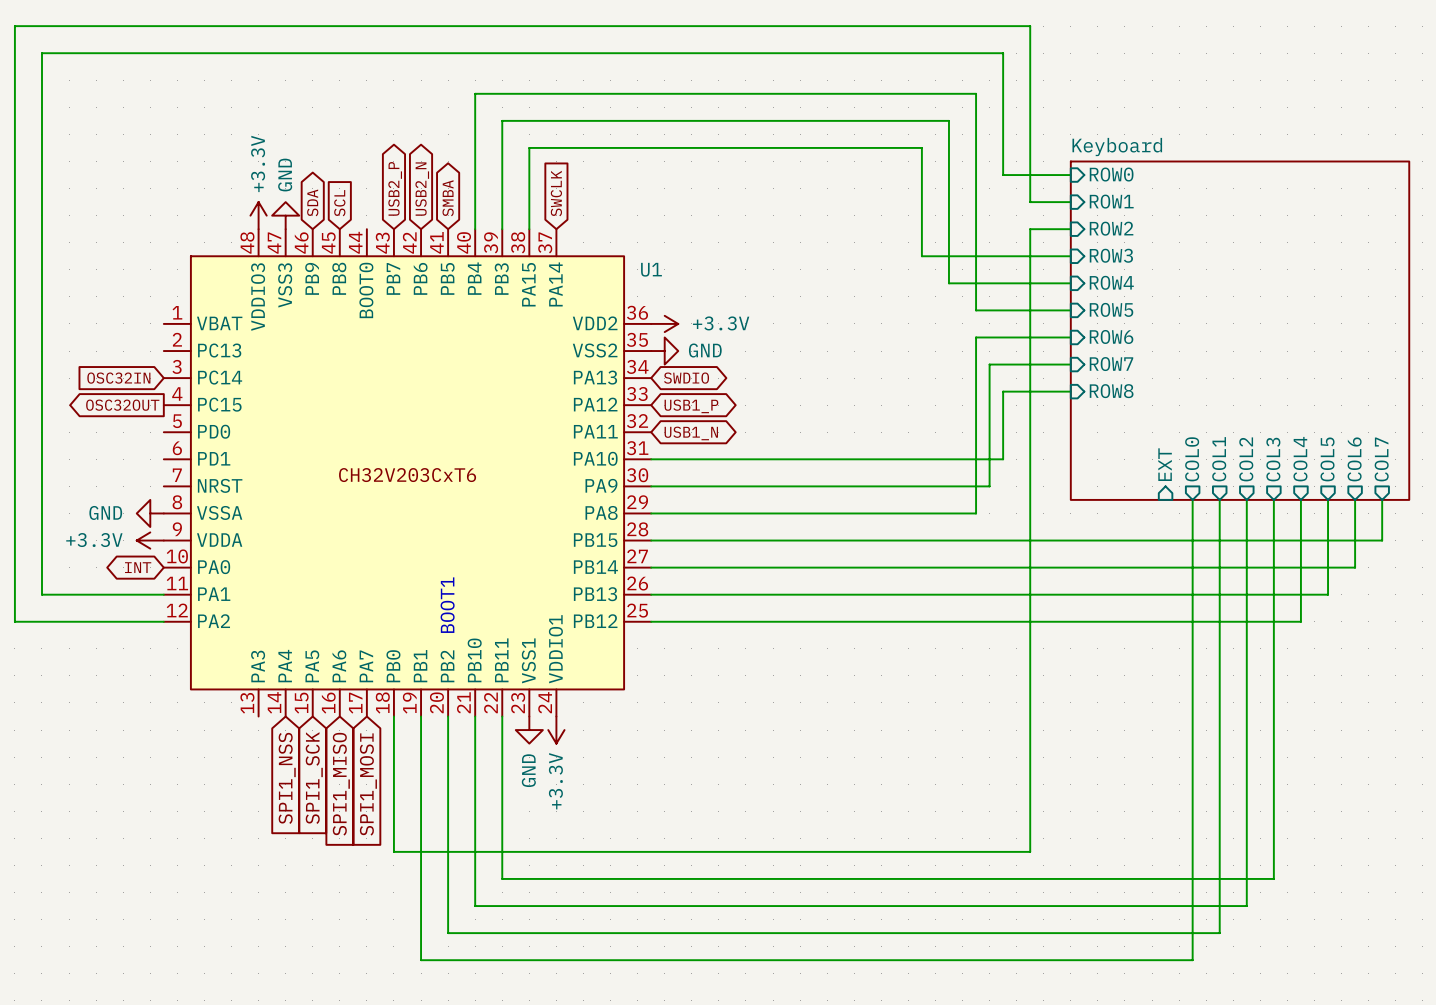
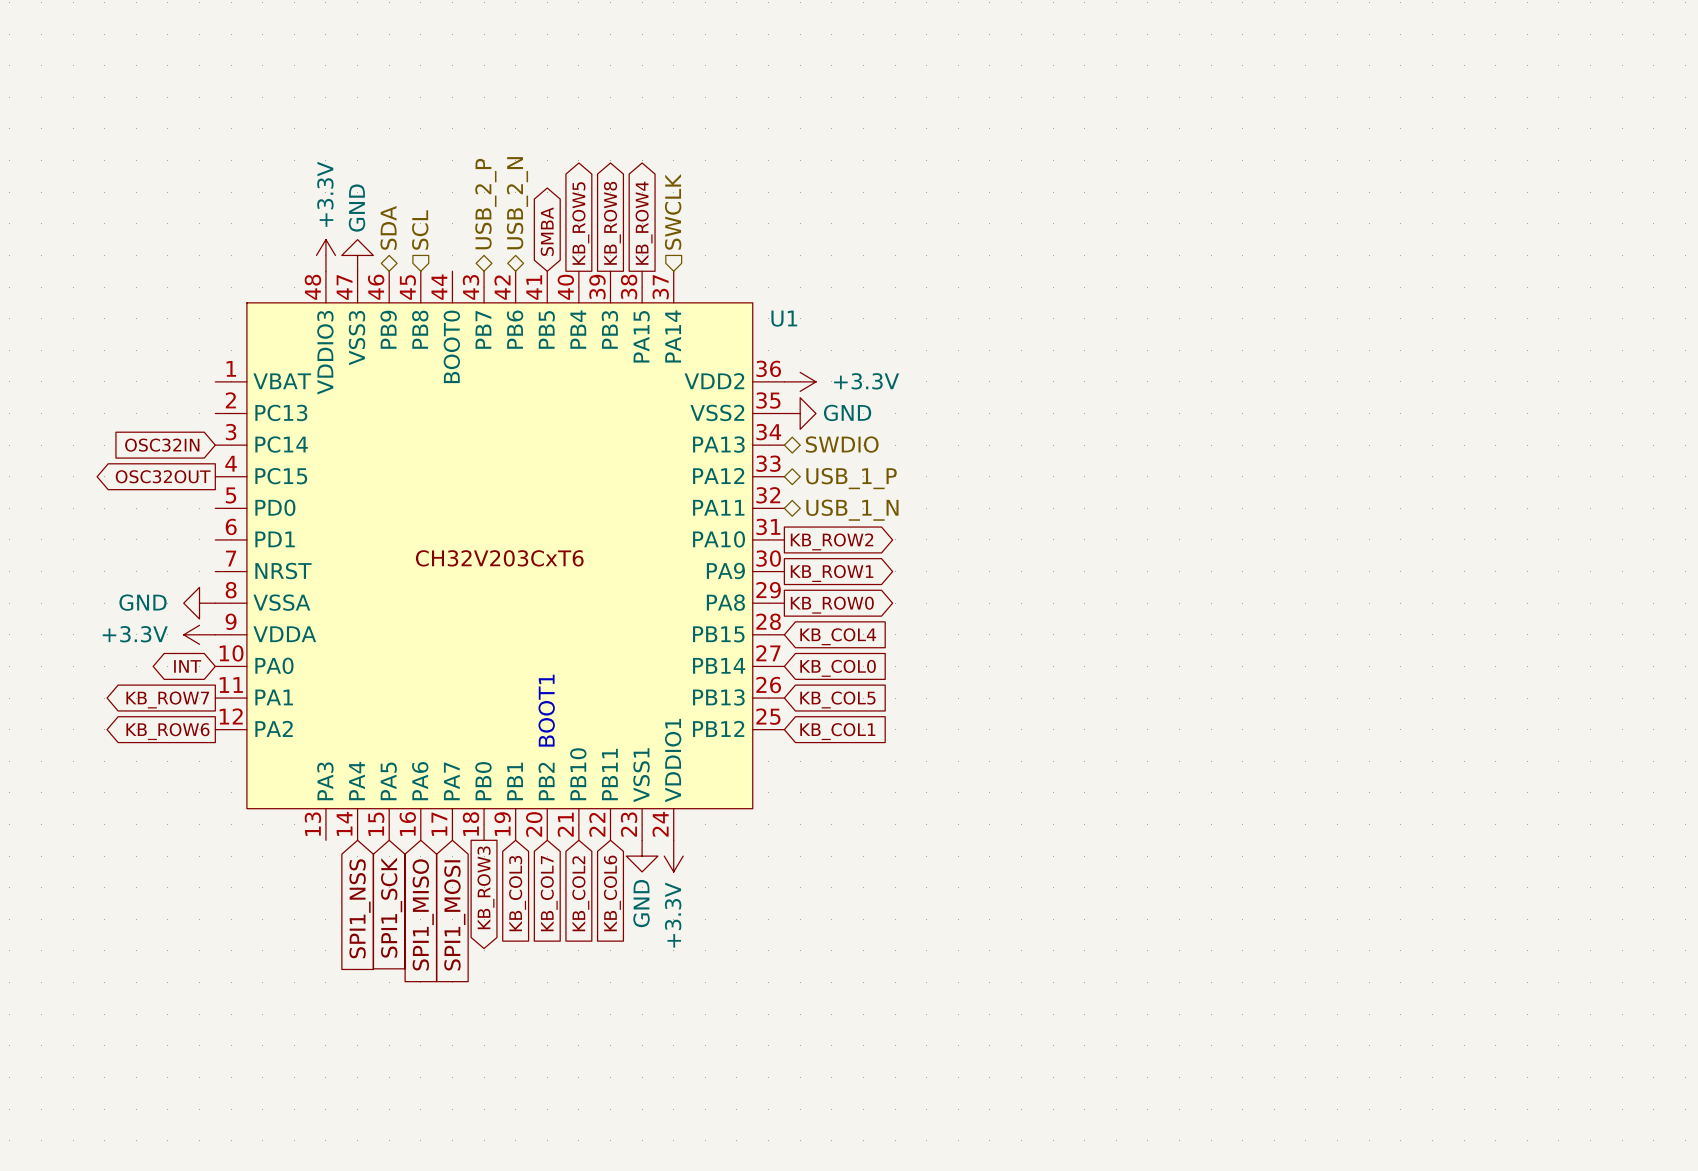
hierarchical label: none -> USB_2_P (485, 204)
hierarchical label: none -> USB_2_N (517, 203)
sheet pin: ROW0 (1111, 174) -> none
wire: (1070, 175) (1003, 175) (1003, 53) (41, 53) (41, 594) (163, 594) -> none
hierarchical label: none -> SWCLK (673, 211)
global label: USB2_P (395, 188) -> none
global label: USB2_N (422, 189) -> none
global label: none -> KB_ROW5 (580, 223)
global label: none -> KB_ROW8 (612, 223)
global label: none -> KB_ROW4 (644, 223)
global label: SWCLK (556, 193) -> none
hierarchical label: none -> SDA (388, 227)
hierarchical label: none -> SCL (420, 230)
sheet pin: ROW1 (1111, 201) -> none
global label: SDA (312, 202) -> none
wire: (1070, 202) (1030, 202) (1030, 26) (14, 26) (14, 621) (163, 621) -> none
global label: SCL (339, 203) -> none
sheet pin: ROW2 (1111, 228) -> none
wire: (475, 229) (475, 93) (976, 93) (976, 310) (1070, 310) -> none
wire: (502, 229) (502, 120) (948, 120) (948, 283) (1070, 283) -> none
wire: (529, 229) (529, 147) (921, 147) (921, 256) (1070, 256) -> none
wire: (1070, 229) (1030, 229) (1030, 851) (393, 851) (393, 716) -> none
sheet pin: ROW3 (1111, 255) -> none
sheet pin: ROW4 (1111, 282) -> none
sheet pin: ROW5 (1111, 309) -> none
sheet Keyboard: (1240, 330) -> none
sheet pin: ROW6 (1111, 336) -> none
wire: (1070, 337) (976, 337) (976, 513) (651, 513) -> none
wire: (1070, 364) (989, 364) (989, 486) (651, 486) -> none
sheet pin: ROW7 (1111, 364) -> none
hierarchical label: none -> SWDIO (842, 444)
global label: SWDIO (686, 378) -> none
wire: (1070, 391) (1003, 391) (1003, 459) (651, 459) -> none
sheet pin: ROW8 (1111, 391) -> none
global label: USB1_P (691, 406) -> none
hierarchical label: none -> USB_1_P (851, 478)
global label: USB1_N (691, 433) -> none
hierarchical label: none -> USB_1_N (852, 510)
sheet pin: COL0 (1192, 459) -> none
sheet pin: COL1 (1219, 459) -> none
sheet pin: COL2 (1246, 459) -> none
sheet pin: COL3 (1273, 459) -> none
sheet pin: COL4 (1300, 459) -> none
sheet pin: COL5 (1327, 459) -> none
sheet pin: COL6 (1354, 459) -> none
sheet pin: COL7 (1381, 459) -> none
global label: none -> KB_ROW2 (832, 541)
sheet pin: EXT (1165, 464) -> none
global label: none -> KB_ROW1 (832, 573)
wire: (1192, 499) (1192, 960) (421, 960) (421, 716) -> none
wire: (1219, 499) (1219, 933) (448, 933) (448, 716) -> none
wire: (1246, 499) (1246, 906) (475, 906) (475, 716) -> none
wire: (1273, 499) (1273, 878) (502, 878) (502, 716) -> none
wire: (1300, 499) (1300, 621) (651, 621) -> none
wire: (1328, 499) (1328, 594) (651, 594) -> none
wire: (1355, 499) (1355, 567) (651, 567) -> none
wire: (1382, 499) (1382, 540) (651, 540) -> none
global label: none -> KB_ROW0 (832, 605)
global label: none -> KB_COL4 (838, 636)
global label: none -> KB_COL0 (838, 668)
global label: none -> KB_ROW7 (167, 699)
global label: none -> KB_COL5 (837, 699)
global label: none -> KB_ROW6 (167, 731)
global label: none -> KB_COL1 (837, 731)
global label: none -> KB_ROW3 (485, 887)
global label: none -> KB_COL3 (517, 893)
global label: none -> KB_COL7 (549, 893)
global label: none -> KB_COL2 (580, 893)
global label: none -> KB_COL6 (612, 893)

